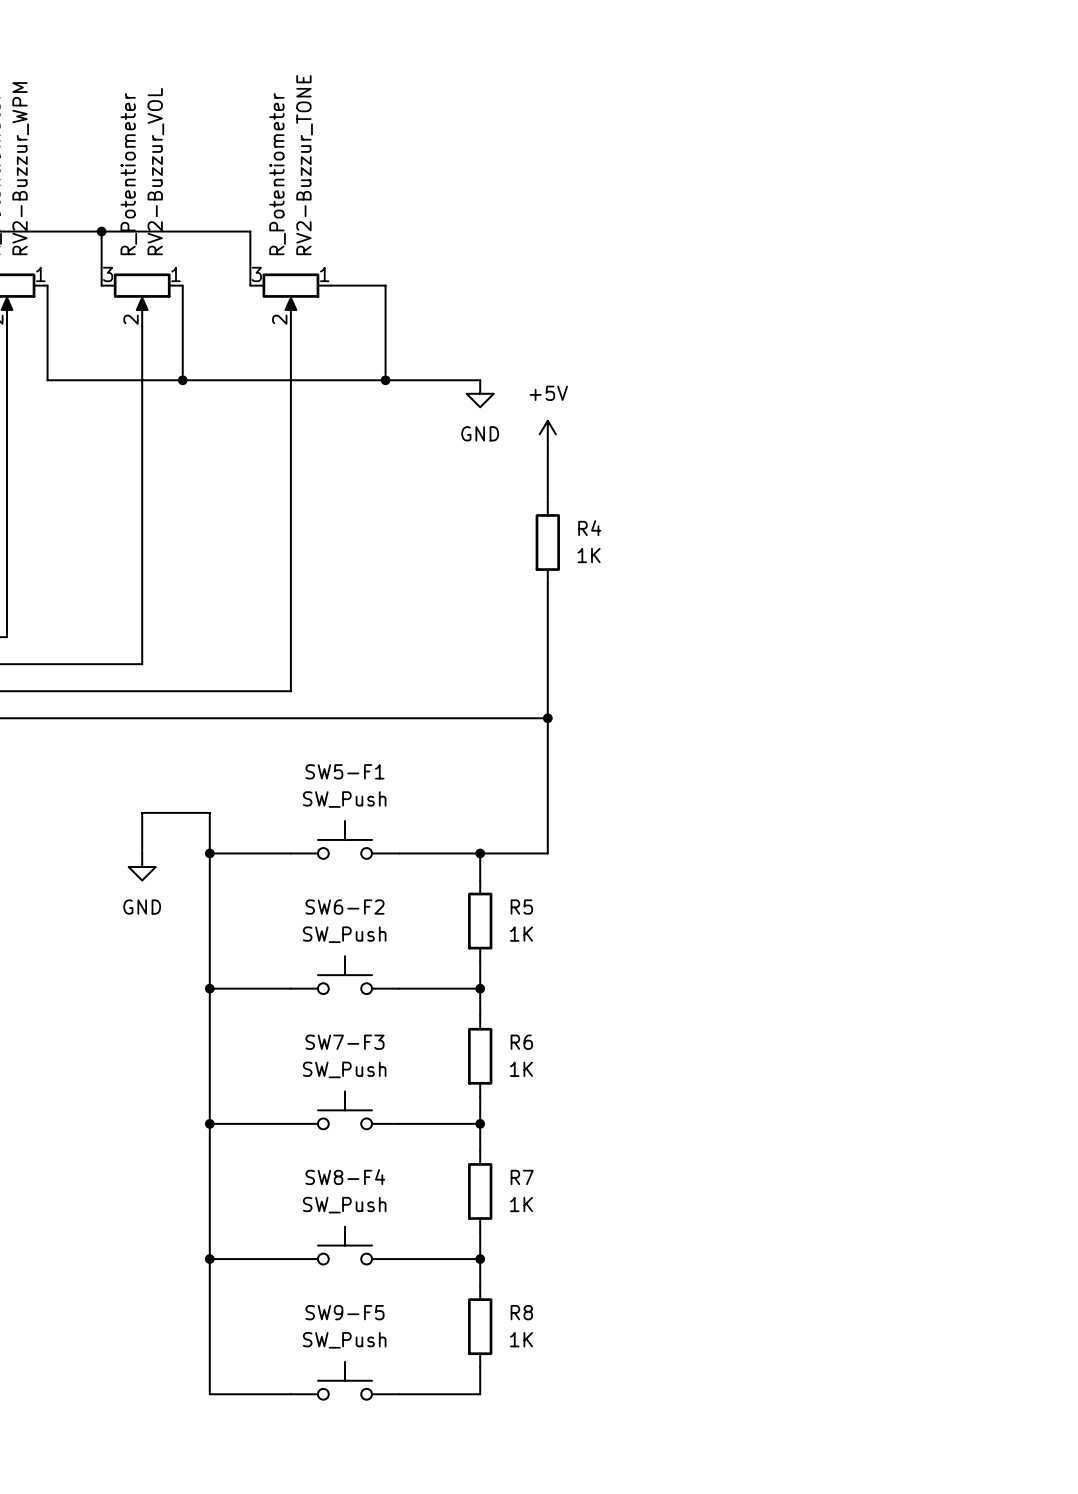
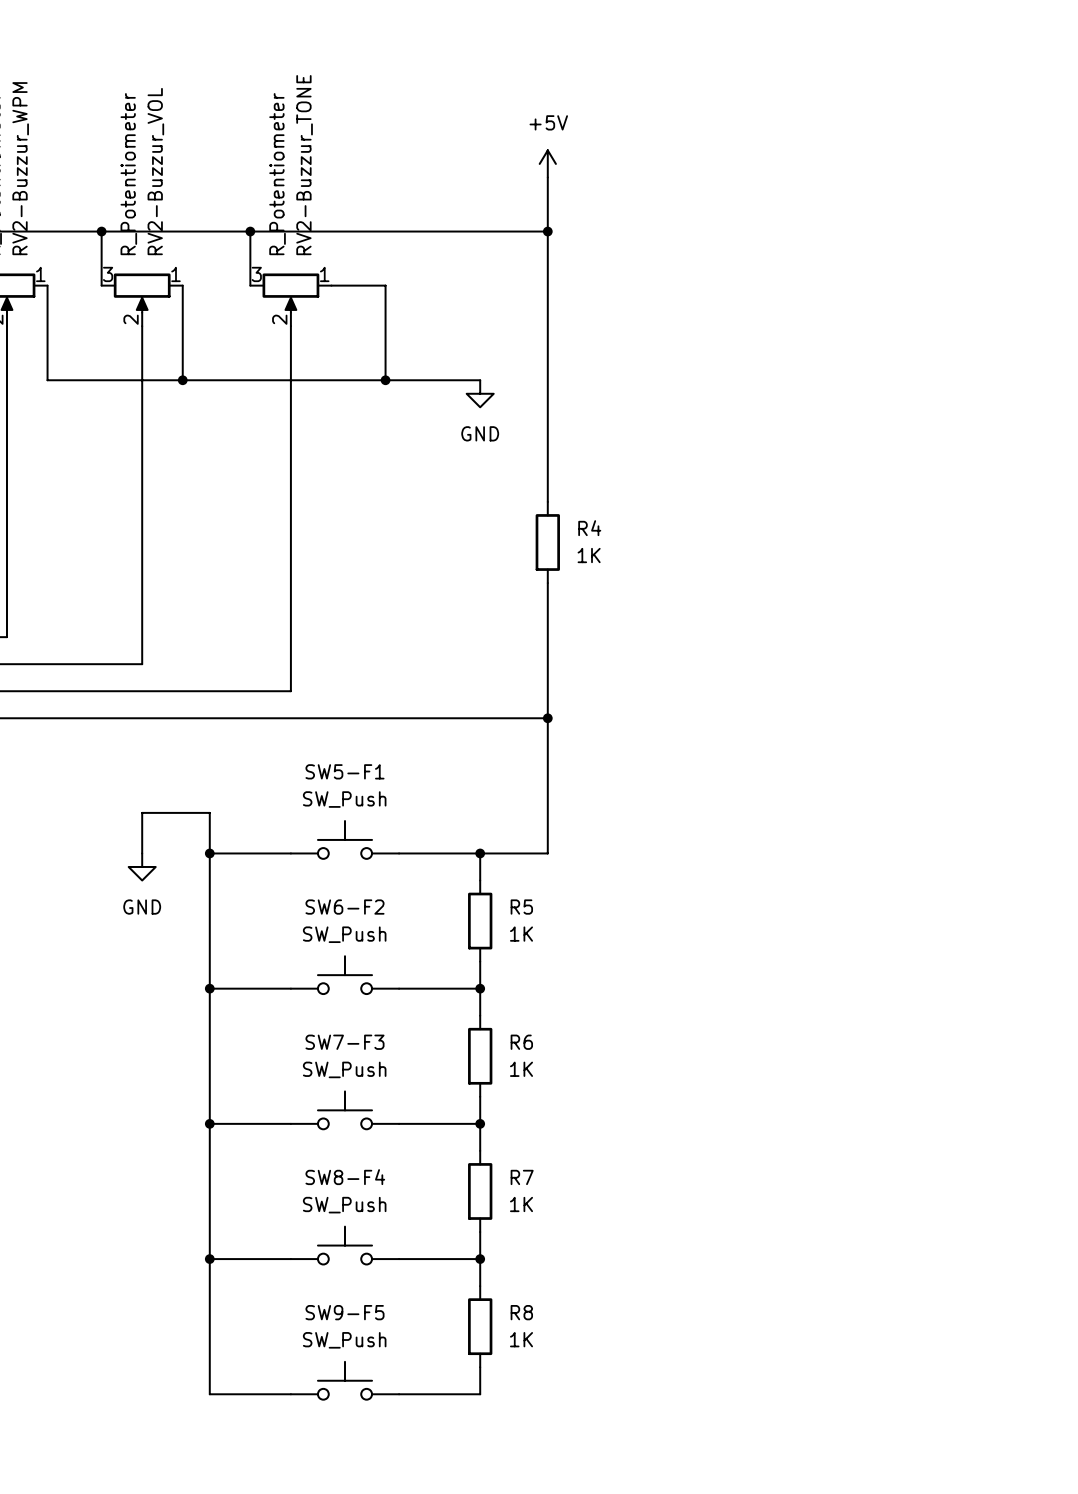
power symbol: none -> +5V (547, 163)
wire: none -> (547, 177) (547, 447)
wire: none -> (250, 231) (547, 231)
junction: none -> (250, 231)
junction: none -> (547, 231)
power symbol: +5V (547, 434) -> none

